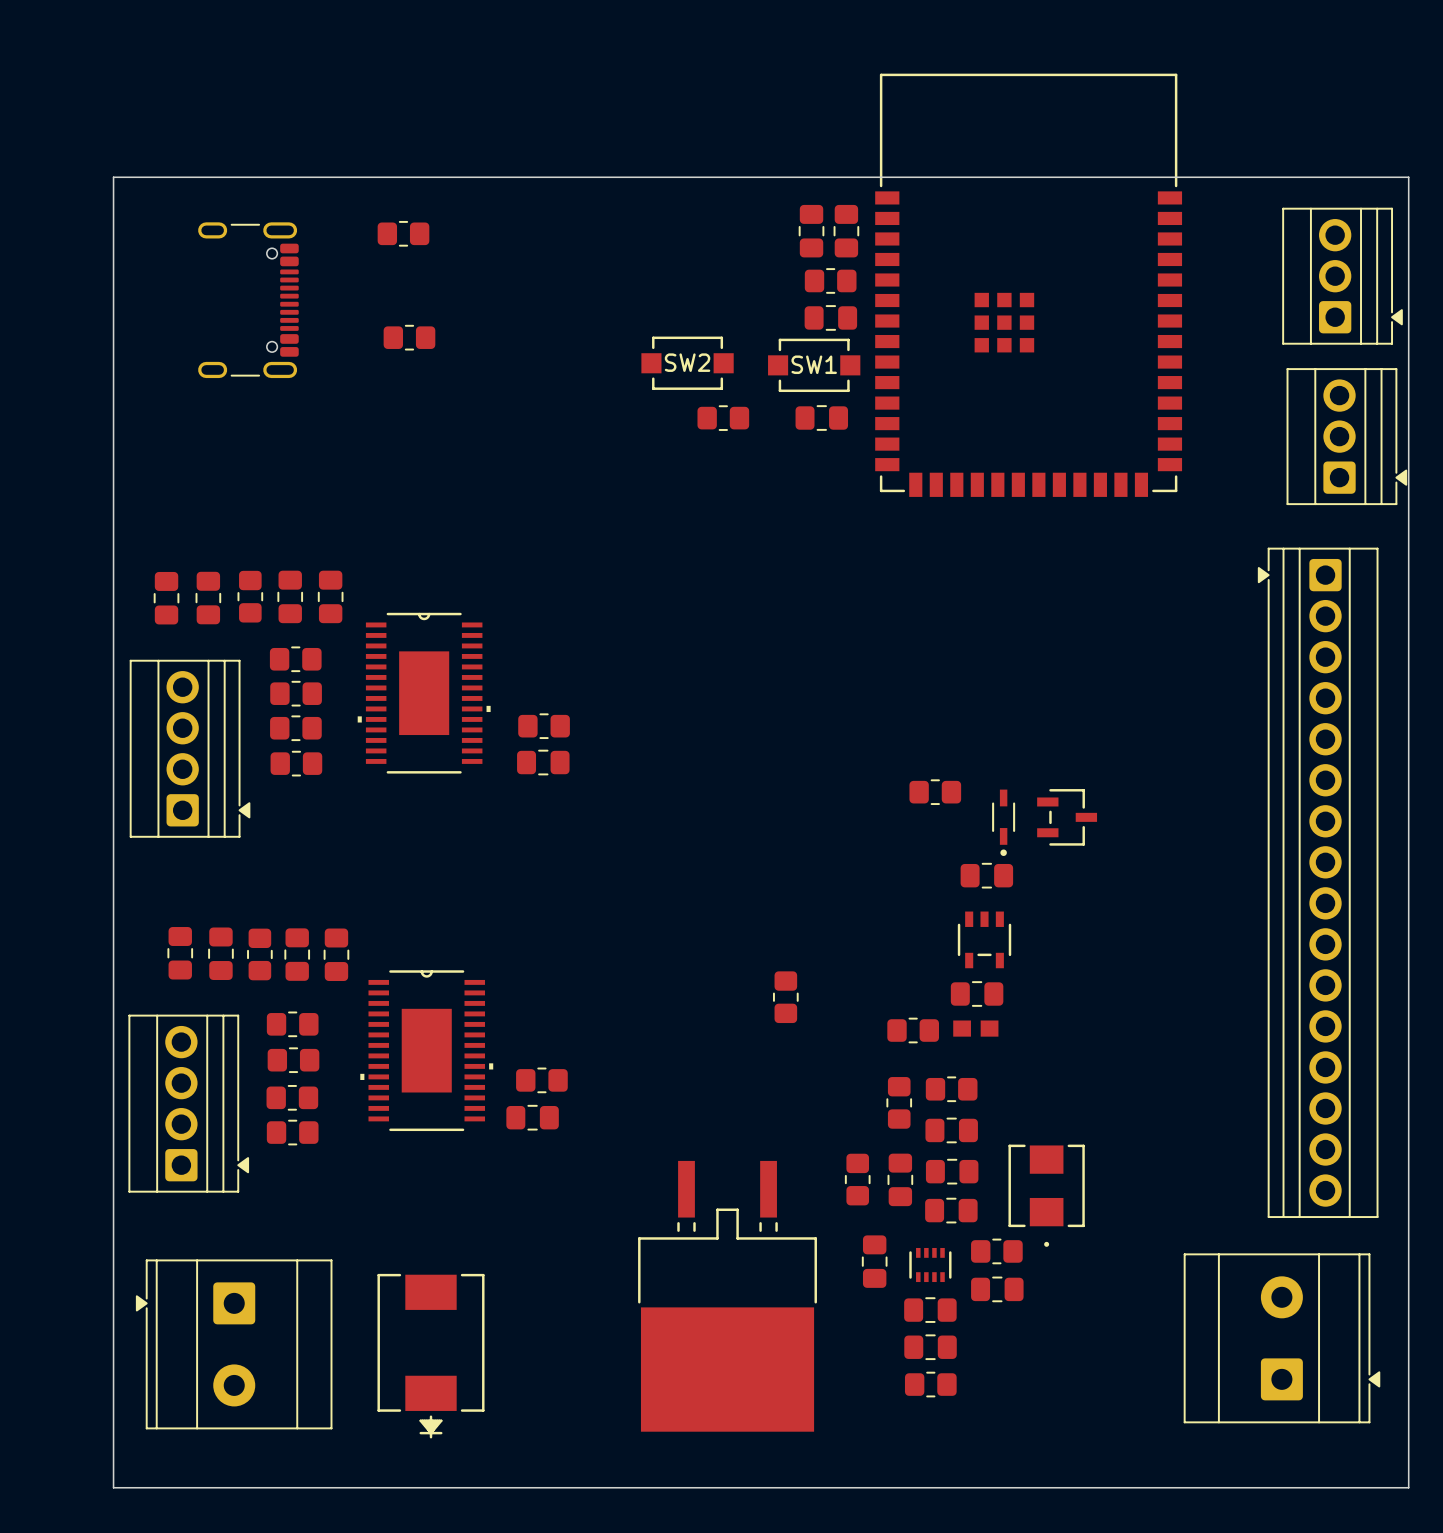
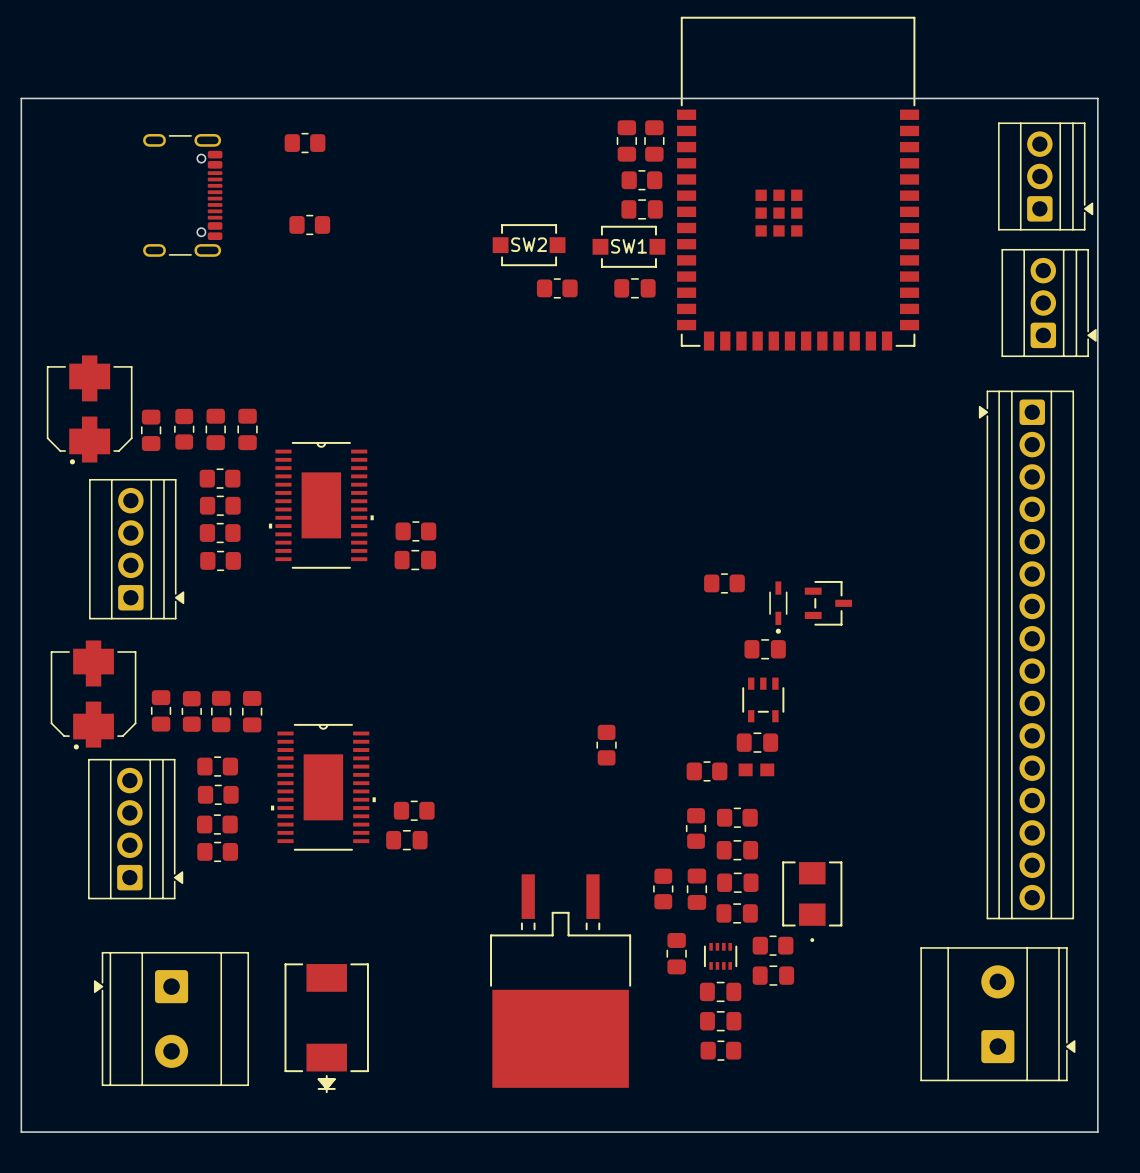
board edge: (113, 177) (113, 1487) -> (76, 98) (21, 98) (21, 1132) (76, 1132)
part: none -> (89, 409)
part: (166, 598) -> none
part: none -> (93, 694)
part: (180, 953) -> none

